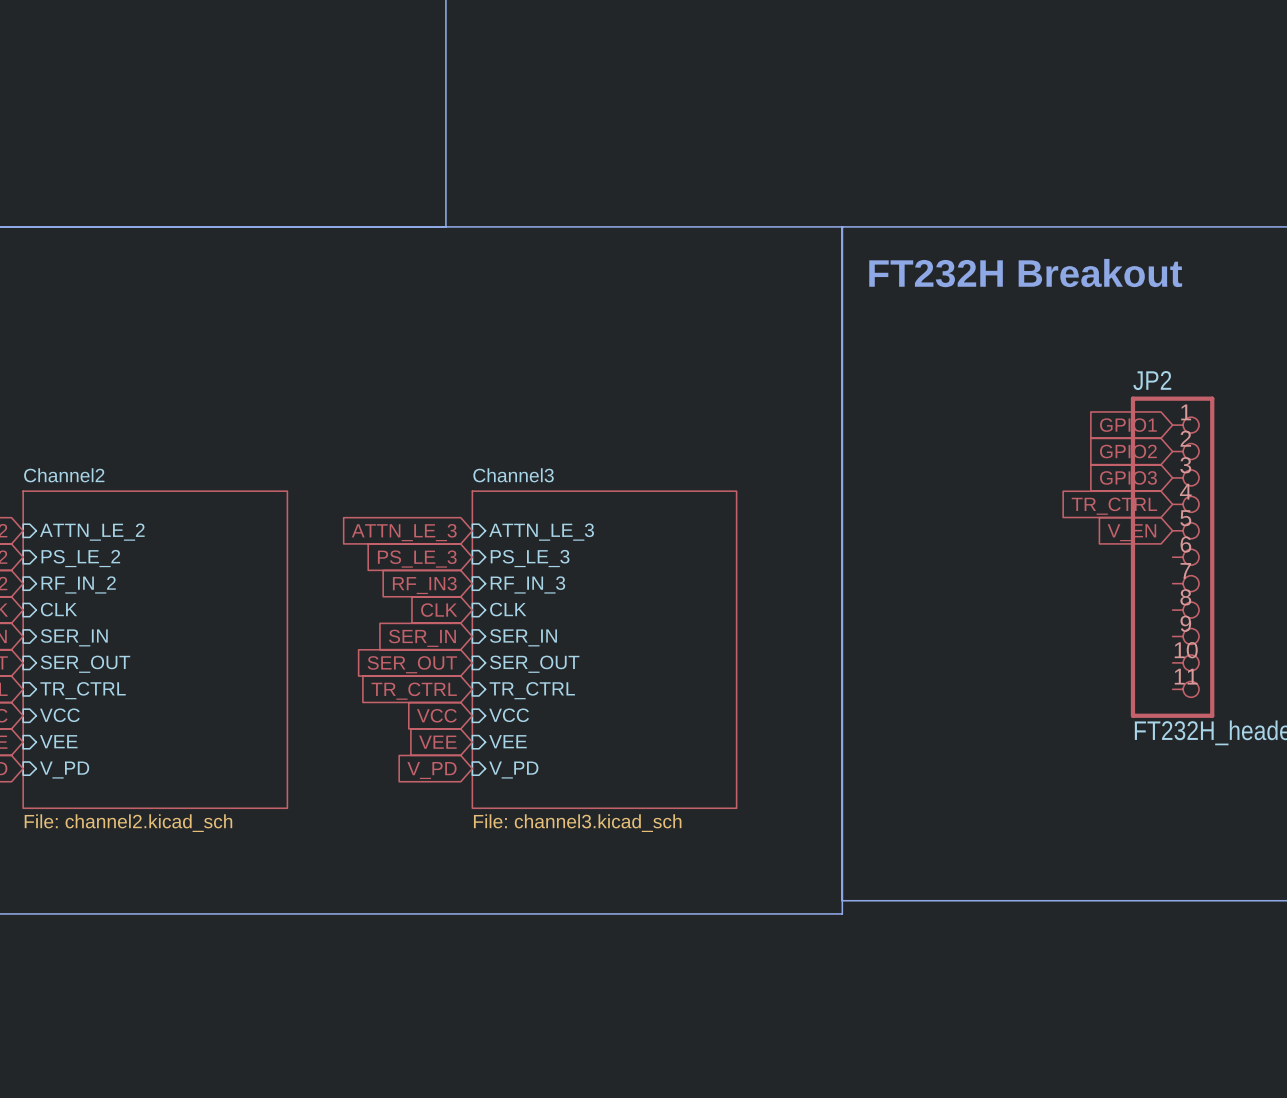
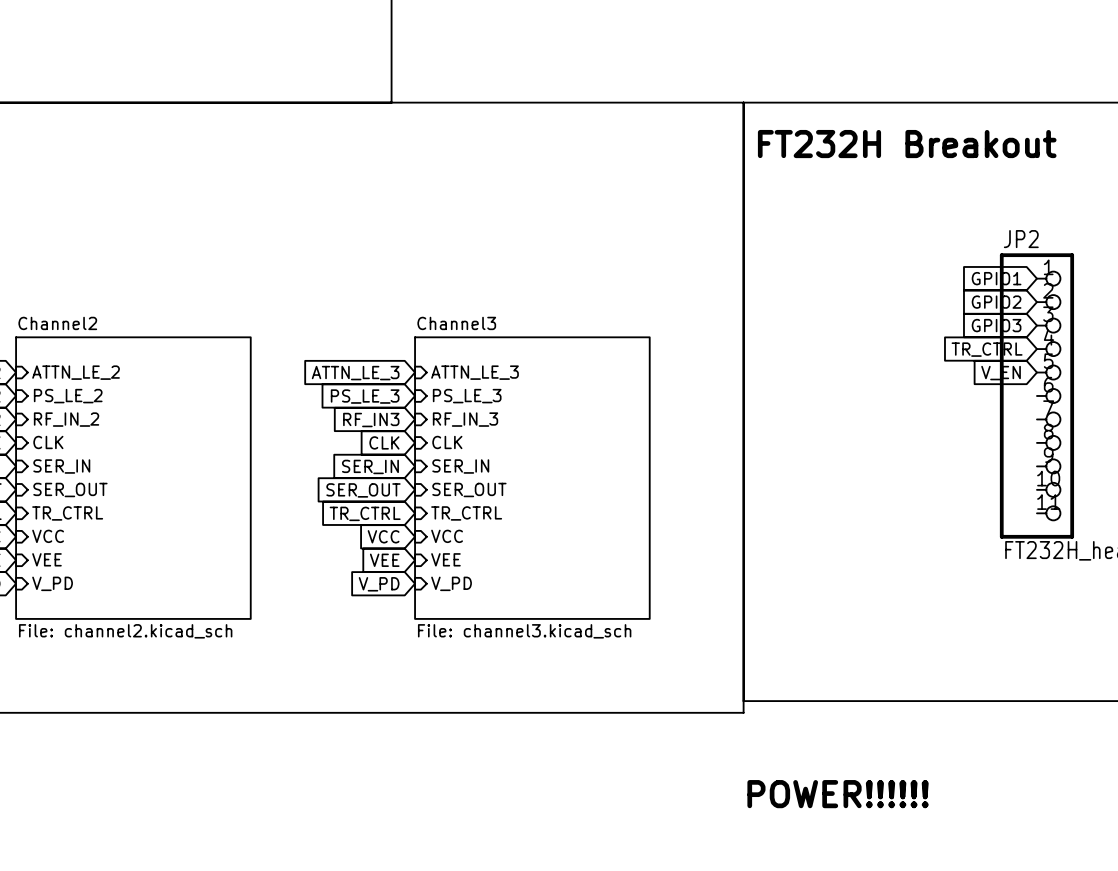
text: none -> POWER!!!!!! (838, 794)

